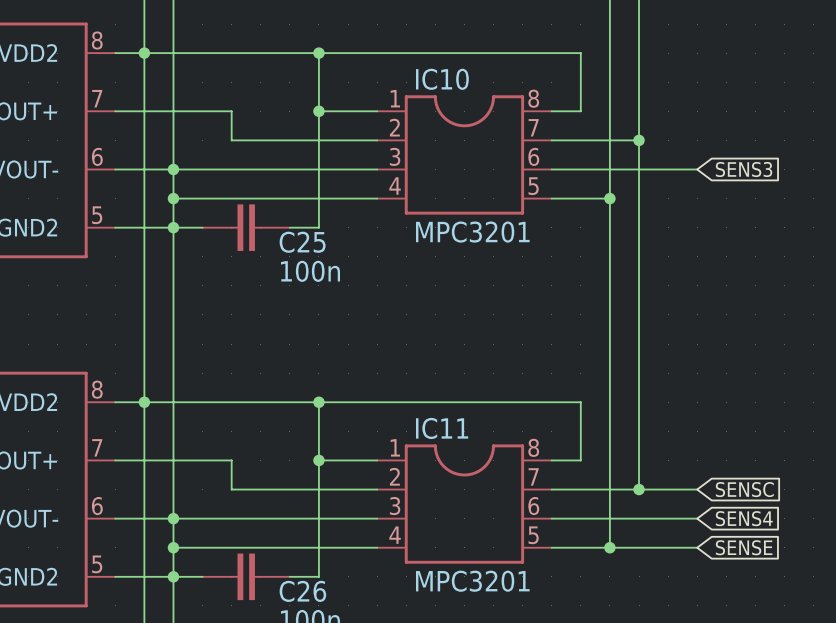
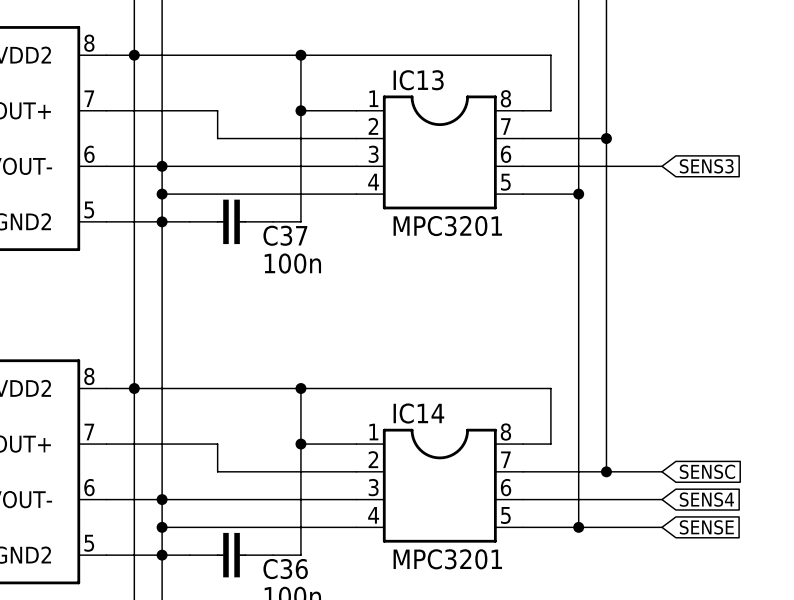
IC10 name: IC10 (442, 79) -> IC13 (418, 80)
C25 name: C25 (302, 242) -> C37 (285, 235)
IC11 name: IC11 (442, 428) -> IC14 (418, 413)
C26 name: C26 (302, 591) -> C36 (285, 569)

